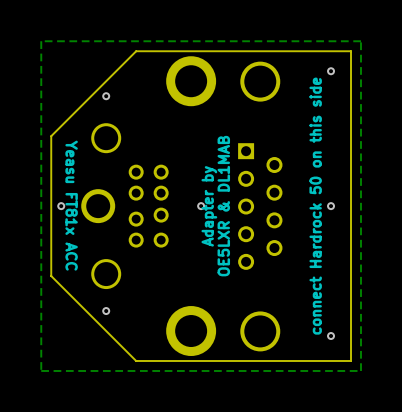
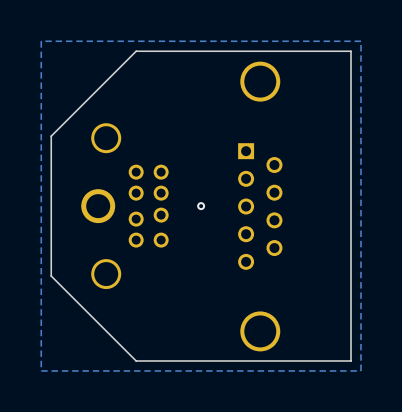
via: (331, 71) -> none
part: (191, 81) -> none
via: (106, 96) -> none
text: Yeasu FT81x ACC (71, 205) -> none
via: (61, 206) -> none
text: Adapter by (209, 206) -> none
text: OE5LXR & DL1MAB (223, 206) -> none
text: connect Hardrock 50 on this side (315, 206) -> none
via: (331, 206) -> none
via: (106, 311) -> none
part: (191, 331) -> none
via: (331, 336) -> none

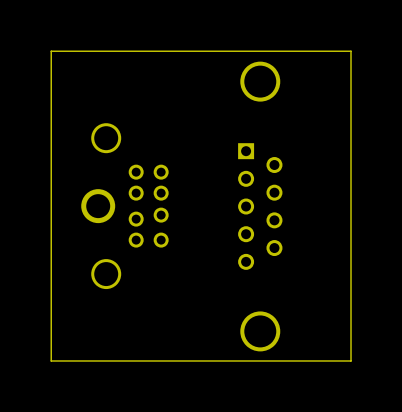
zone outline: (360, 41) (360, 370) (41, 370) (41, 41) (360, 41) -> none
board edge: (136, 51) (51, 136) -> (136, 51) (51, 51) (51, 136)
via: (201, 206) -> none
board edge: (51, 276) (136, 360) -> (51, 276) (51, 360) (136, 360)

